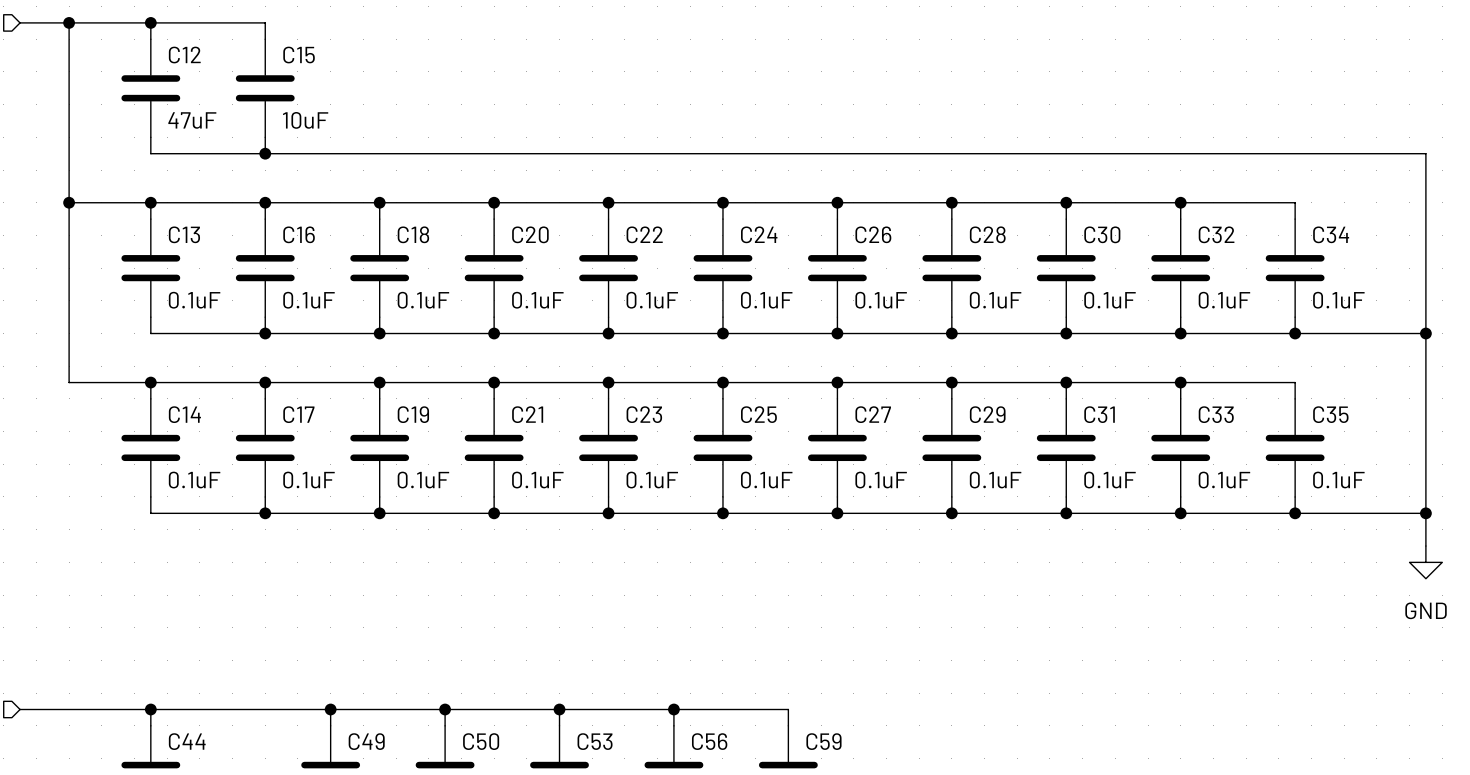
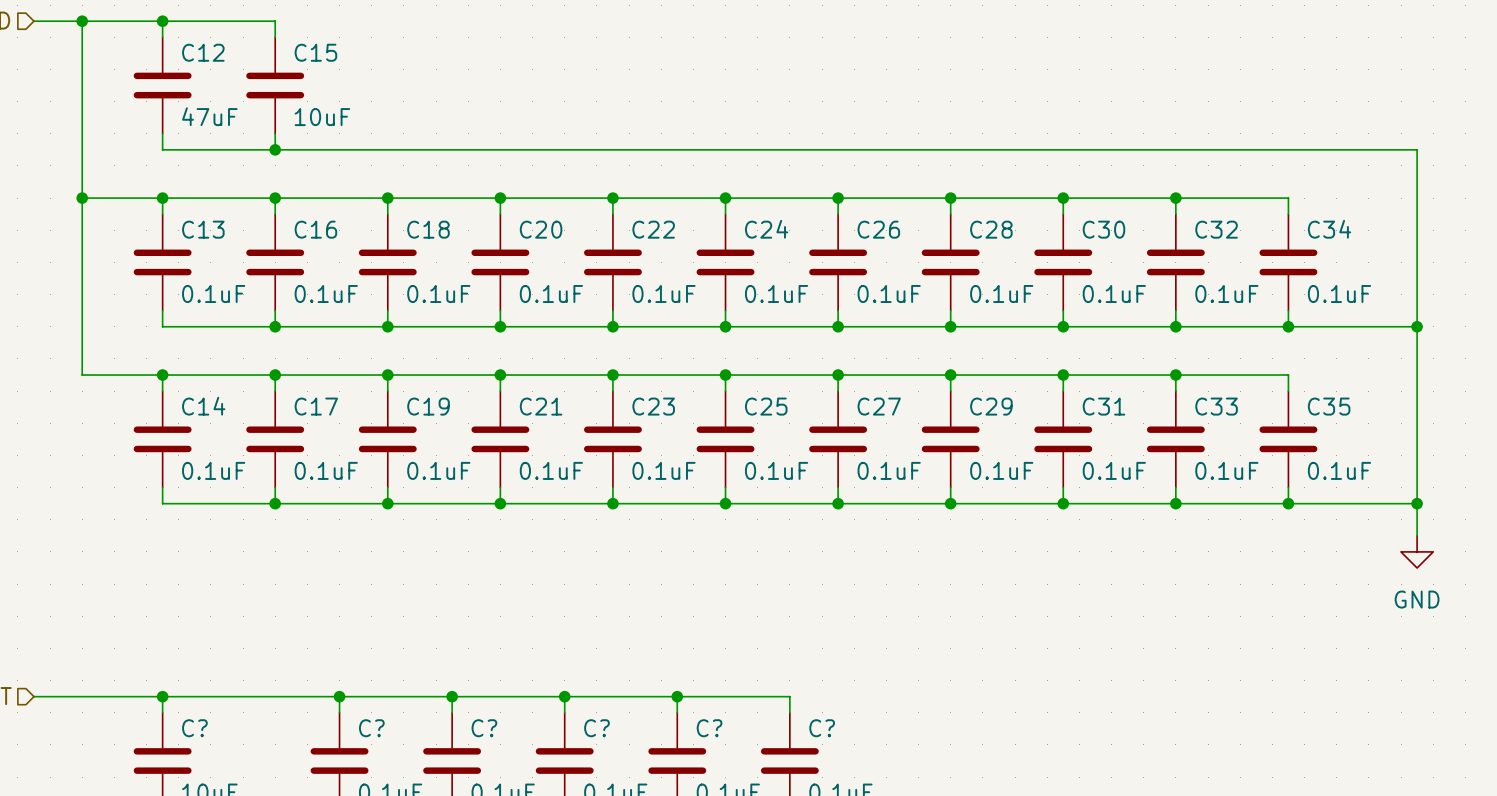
C44 name: C44 (187, 741) -> C? (194, 728)
C49 name: C49 (366, 741) -> C? (371, 728)
C50 name: C50 (481, 741) -> C? (484, 728)
C53 name: C53 (595, 741) -> C? (596, 728)
C56 name: C56 (709, 741) -> C? (709, 728)
C59 name: C59 (823, 741) -> C? (822, 728)

